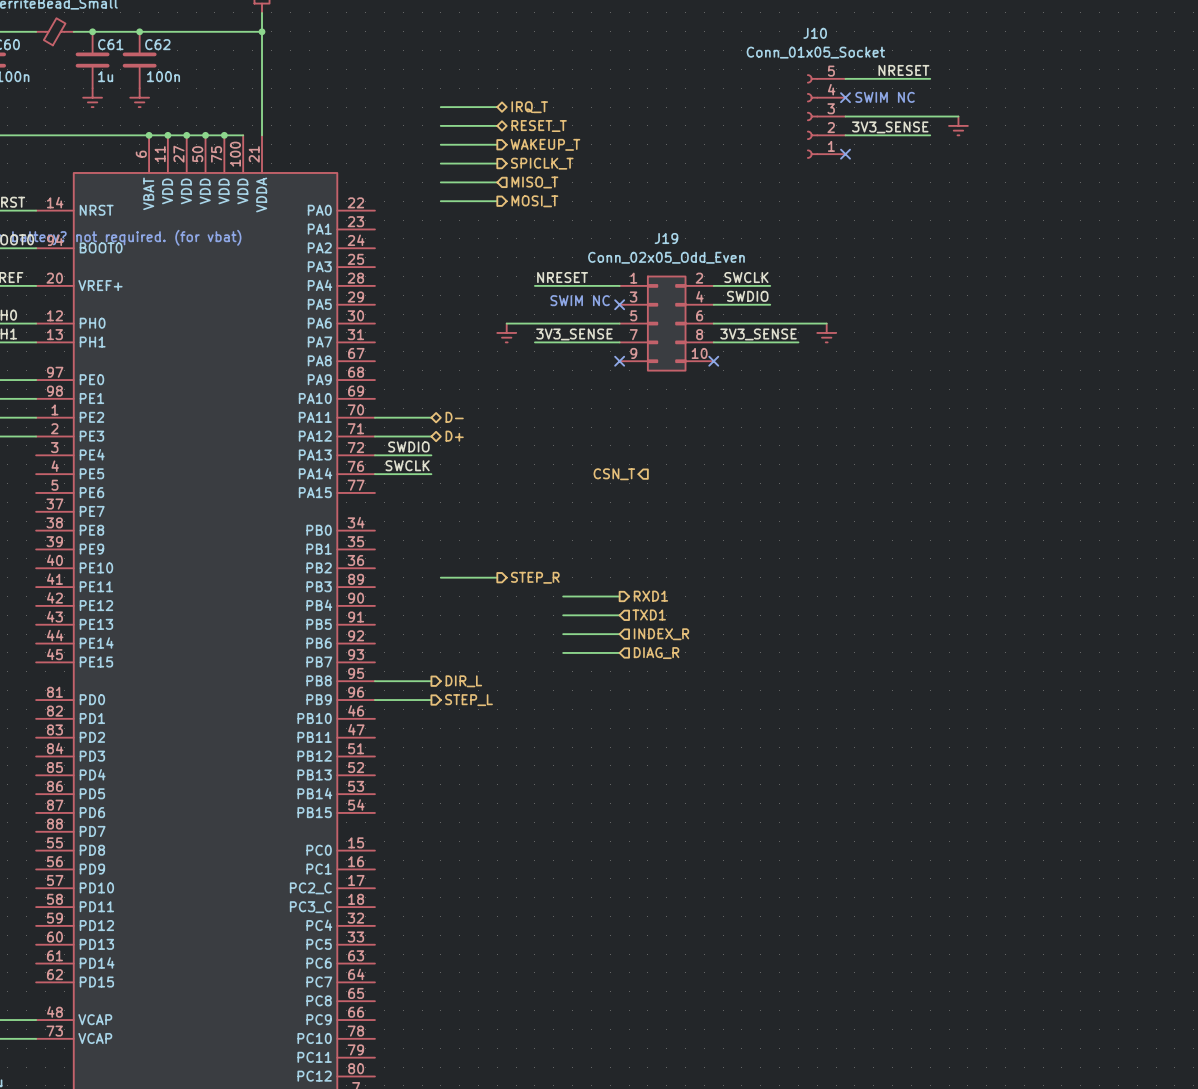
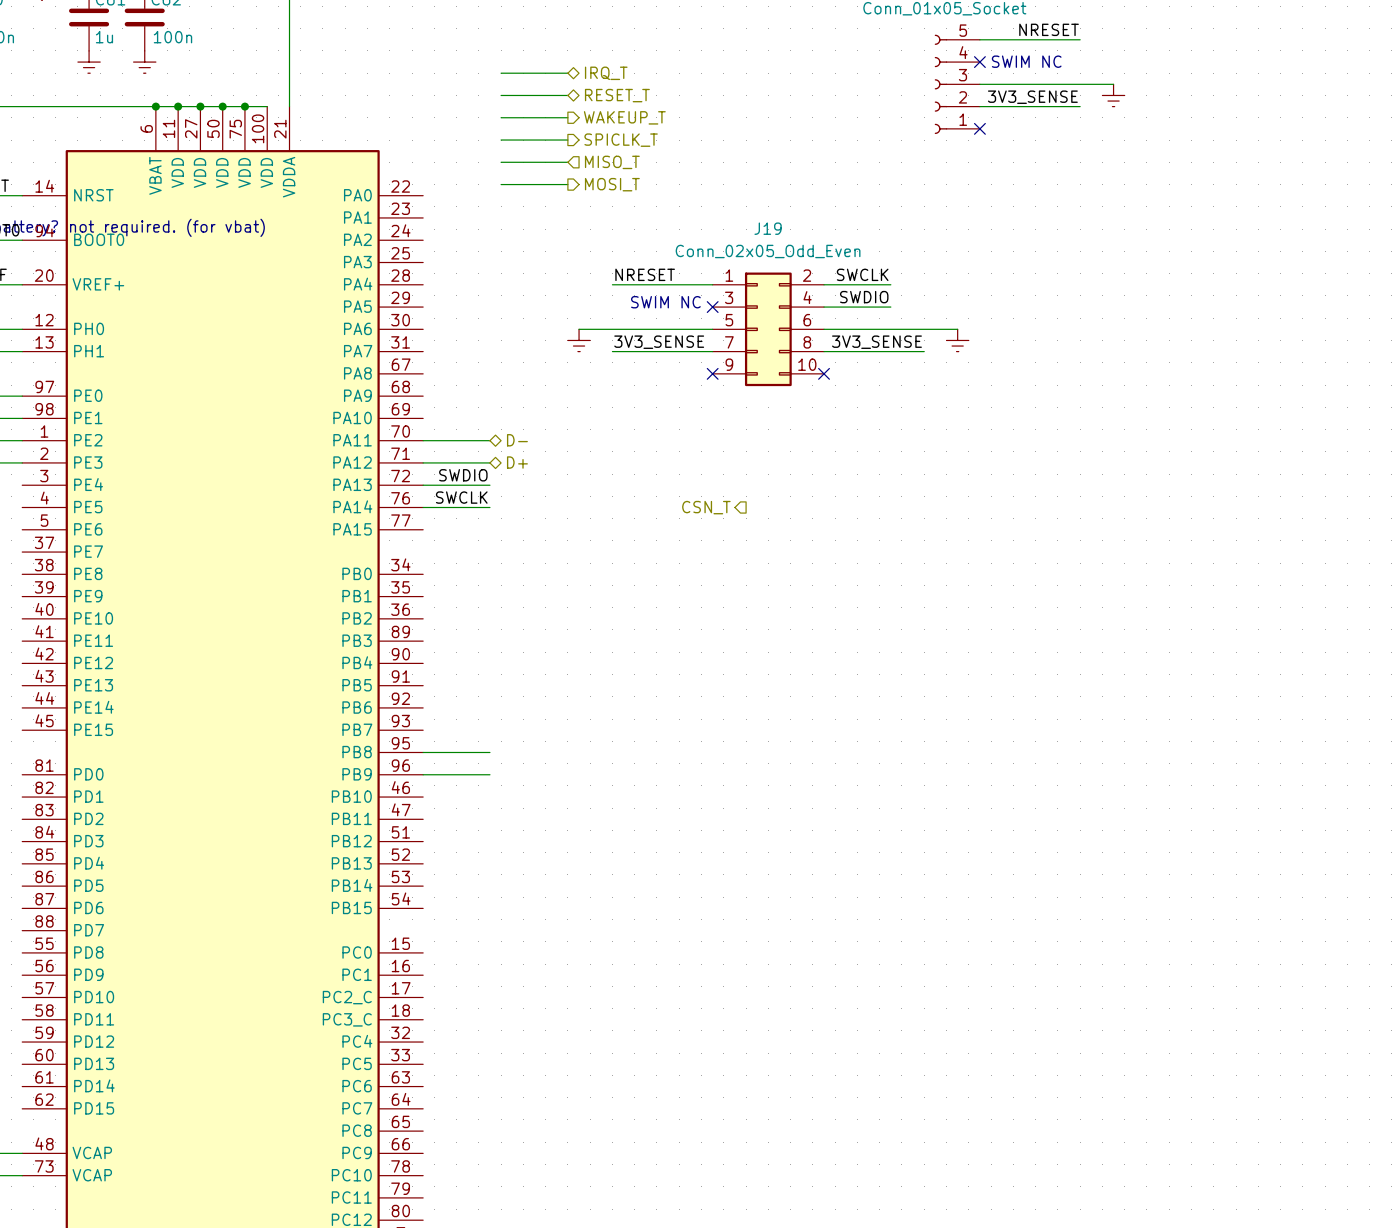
wire: (440, 577) (497, 577) -> none
hierarchical label: STEP_R (535, 577) -> none
wire: (563, 596) (619, 596) -> none
hierarchical label: RXD1 (650, 596) -> none
hierarchical label: TXD1 (649, 614) -> none
wire: (563, 615) (619, 615) -> none
wire: (563, 634) (619, 634) -> none
hierarchical label: INDEX_R (661, 634) -> none
wire: (563, 652) (619, 652) -> none
hierarchical label: DIAG_R (656, 653) -> none
hierarchical label: DIR_L (463, 681) -> none
hierarchical label: STEP_L (468, 700) -> none

